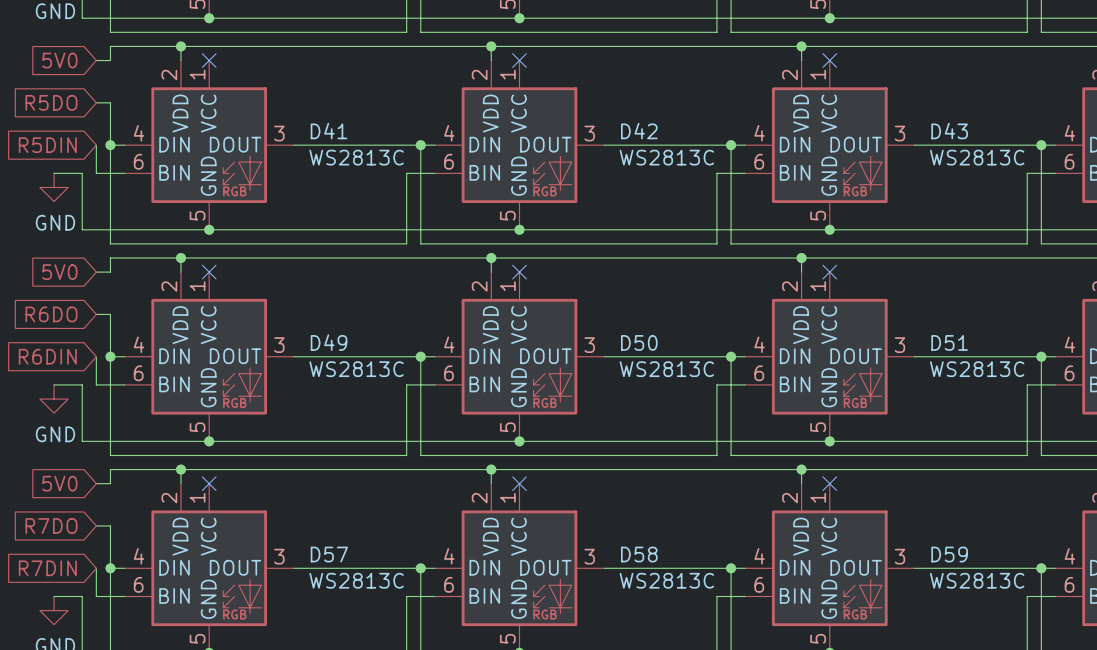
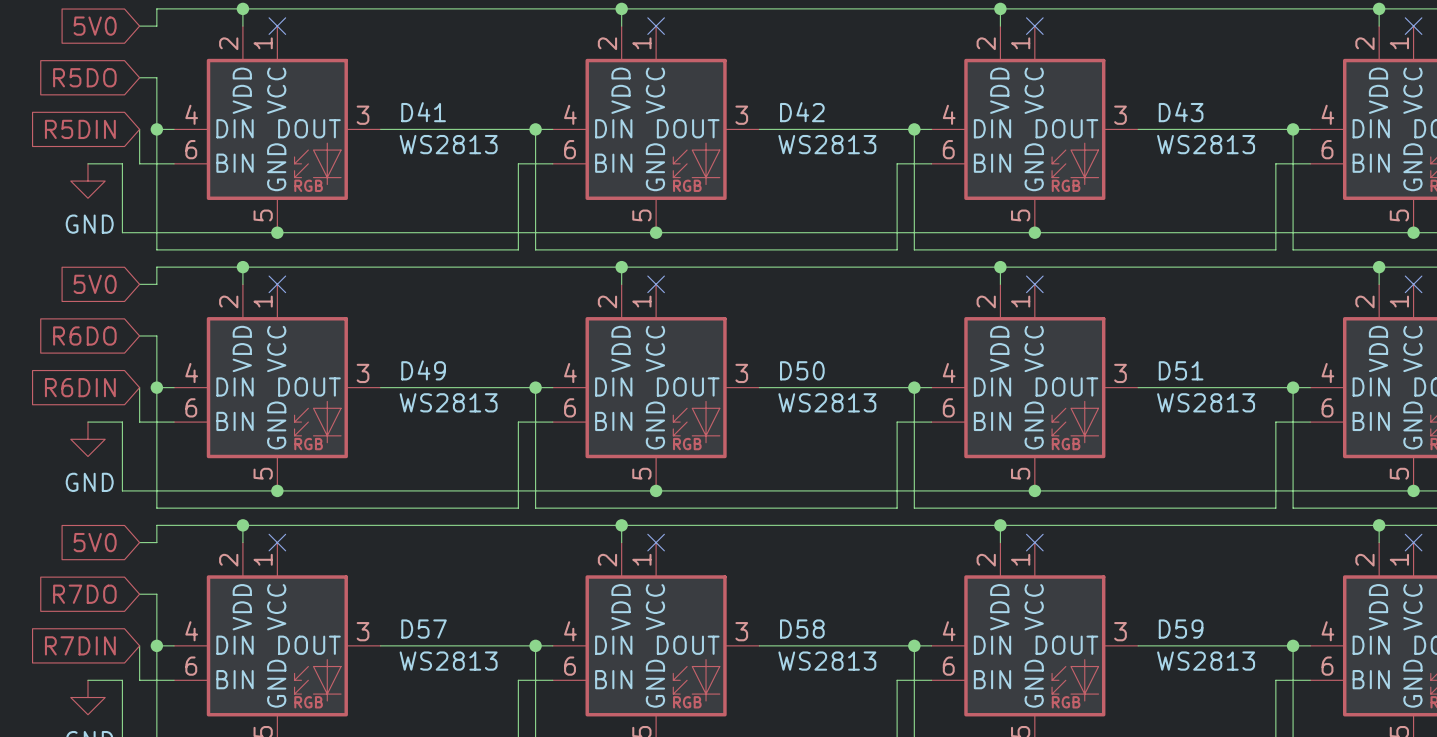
D41 value: WS2813C (356, 157) -> WS2813 (448, 144)
D42 value: WS2813C (666, 157) -> WS2813 (827, 144)
D43 value: WS2813C (977, 157) -> WS2813 (1206, 144)
D49 value: WS2813C (356, 369) -> WS2813 (448, 402)
D50 value: WS2813C (666, 369) -> WS2813 (827, 402)
D51 value: WS2813C (977, 369) -> WS2813 (1206, 402)
D57 value: WS2813C (356, 580) -> WS2813 (448, 661)
D58 value: WS2813C (666, 580) -> WS2813 (827, 661)
D59 value: WS2813C (977, 580) -> WS2813 (1206, 661)

